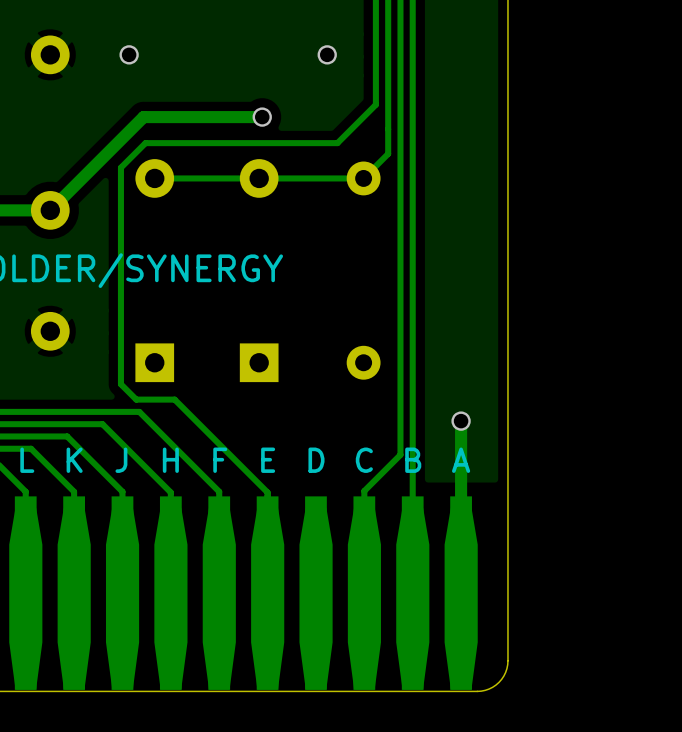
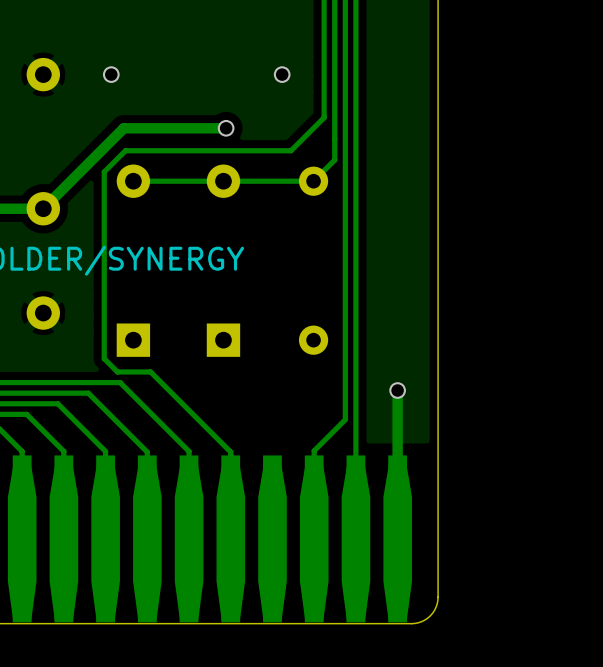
text: L (27, 460) -> none
text: K (74, 460) -> none
text: J (121, 460) -> none
text: H (170, 460) -> none
text: F (220, 460) -> none
text: E (268, 460) -> none
text: D (316, 460) -> none
text: C (364, 460) -> none
text: B (413, 460) -> none
text: A (461, 460) -> none

